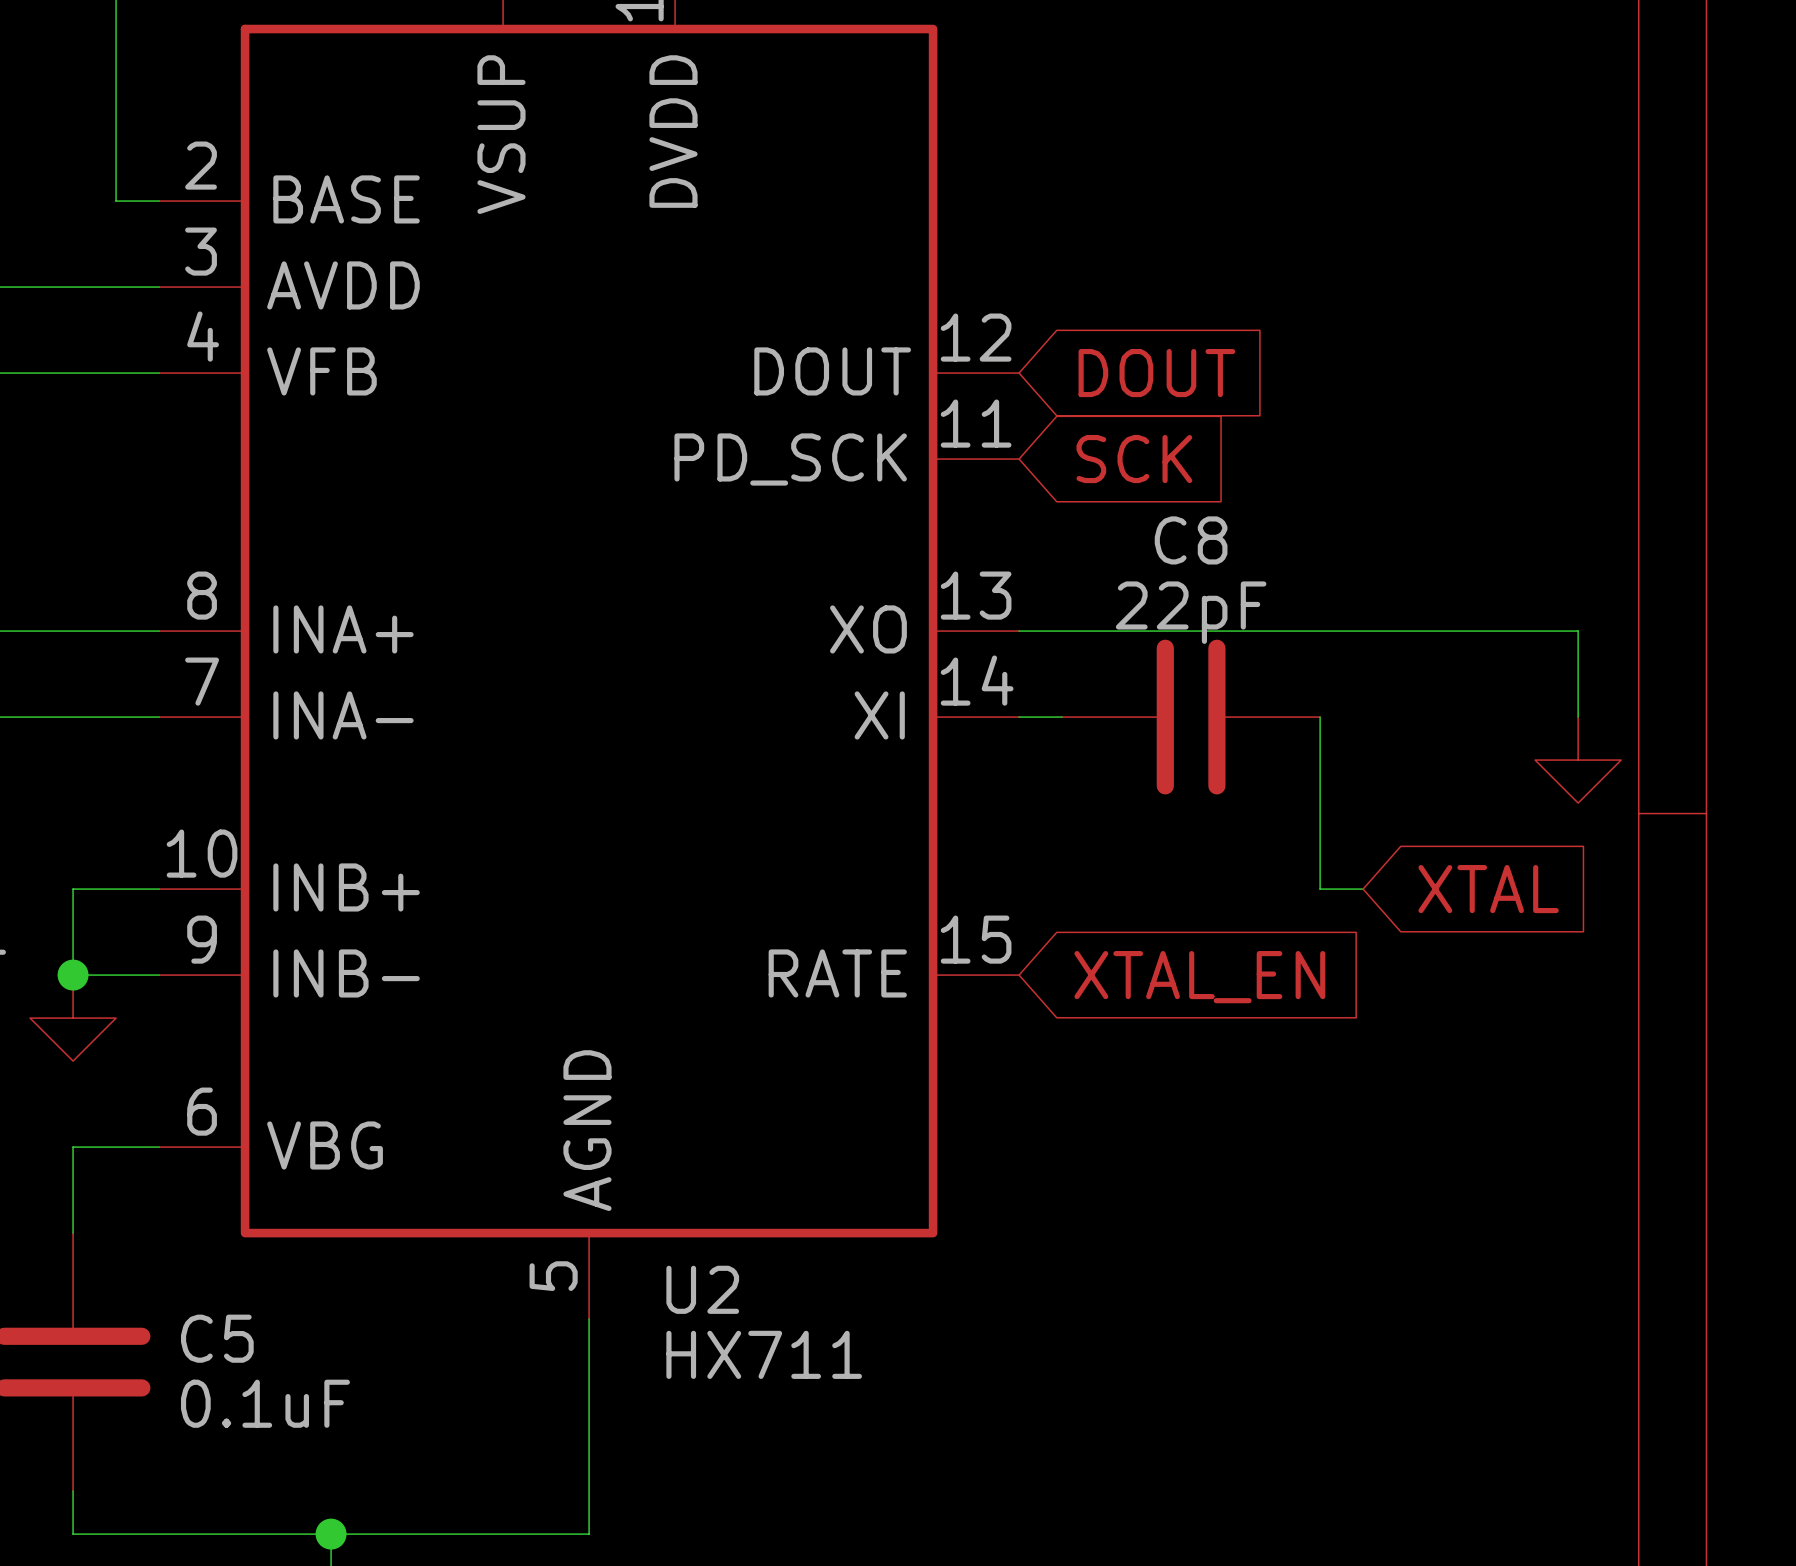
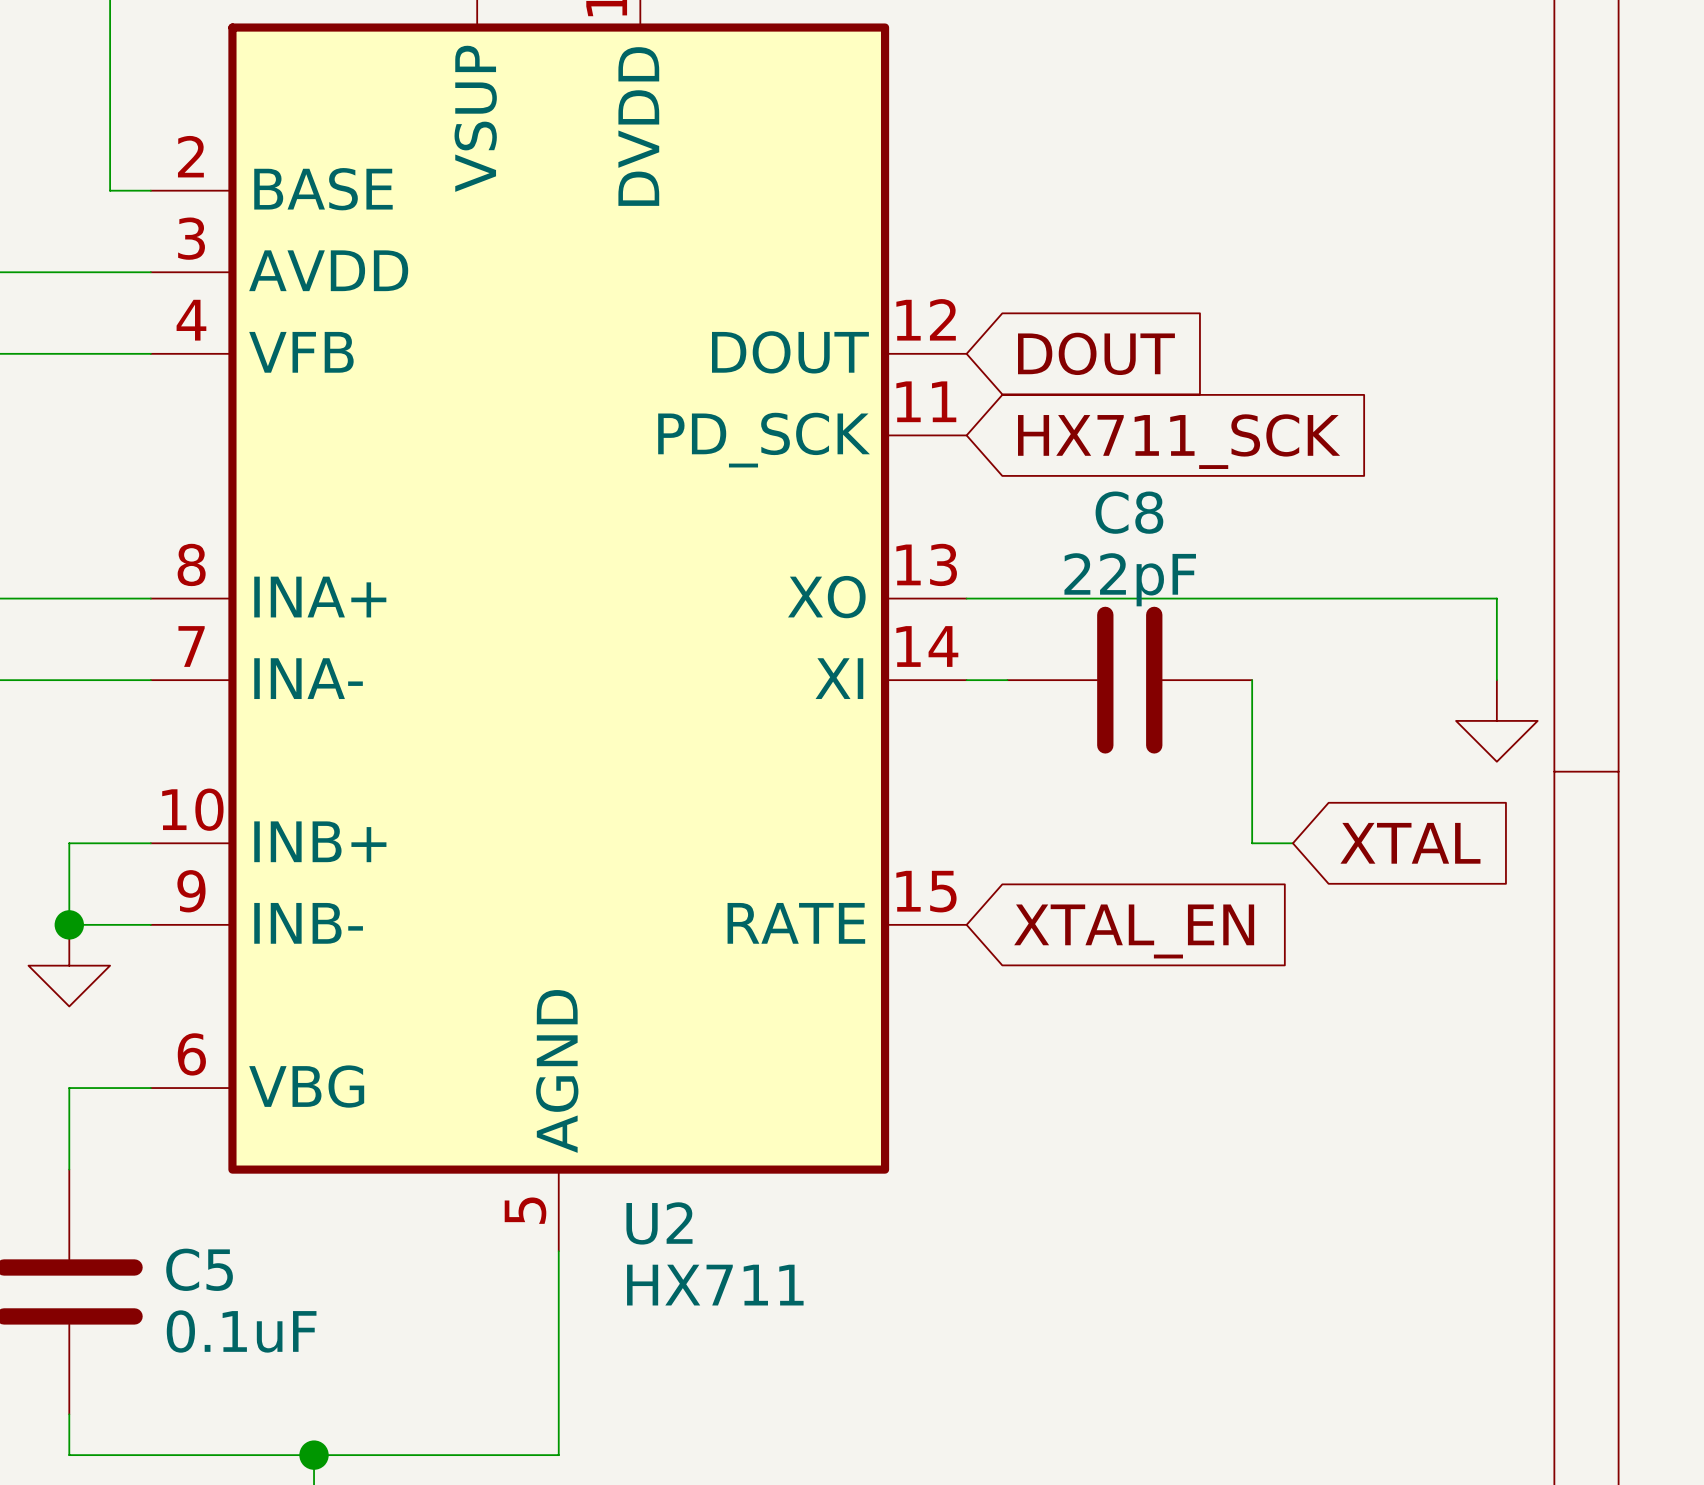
global label: SCK (1134, 459) -> HX711_SCK (1179, 441)

